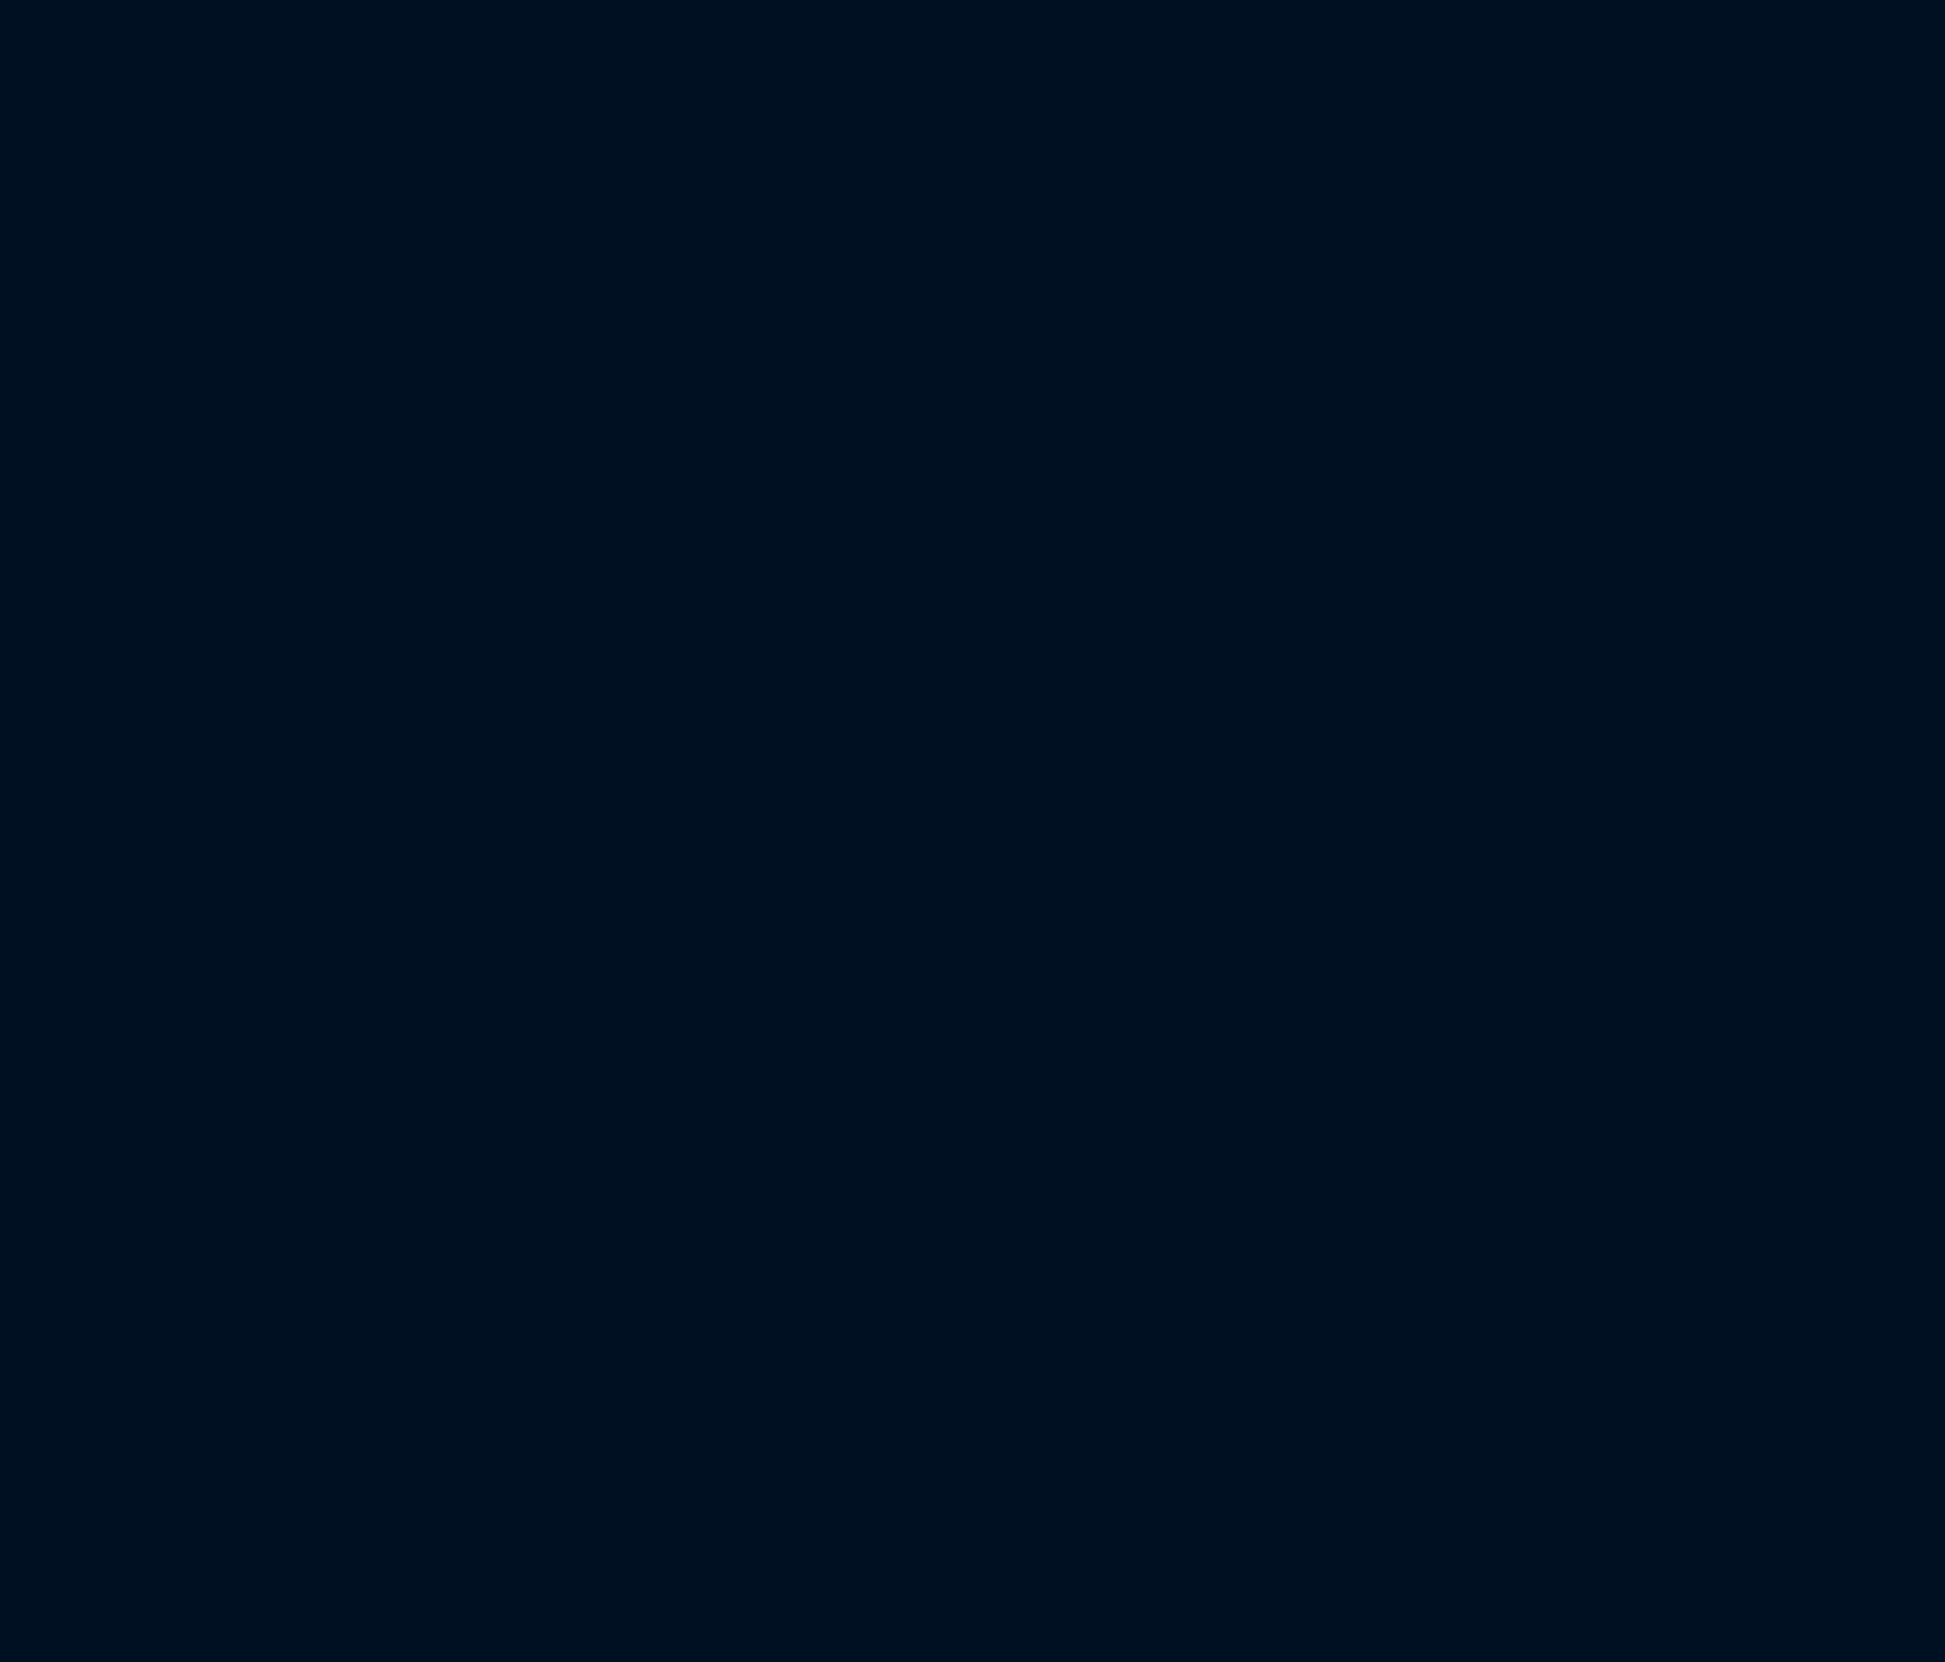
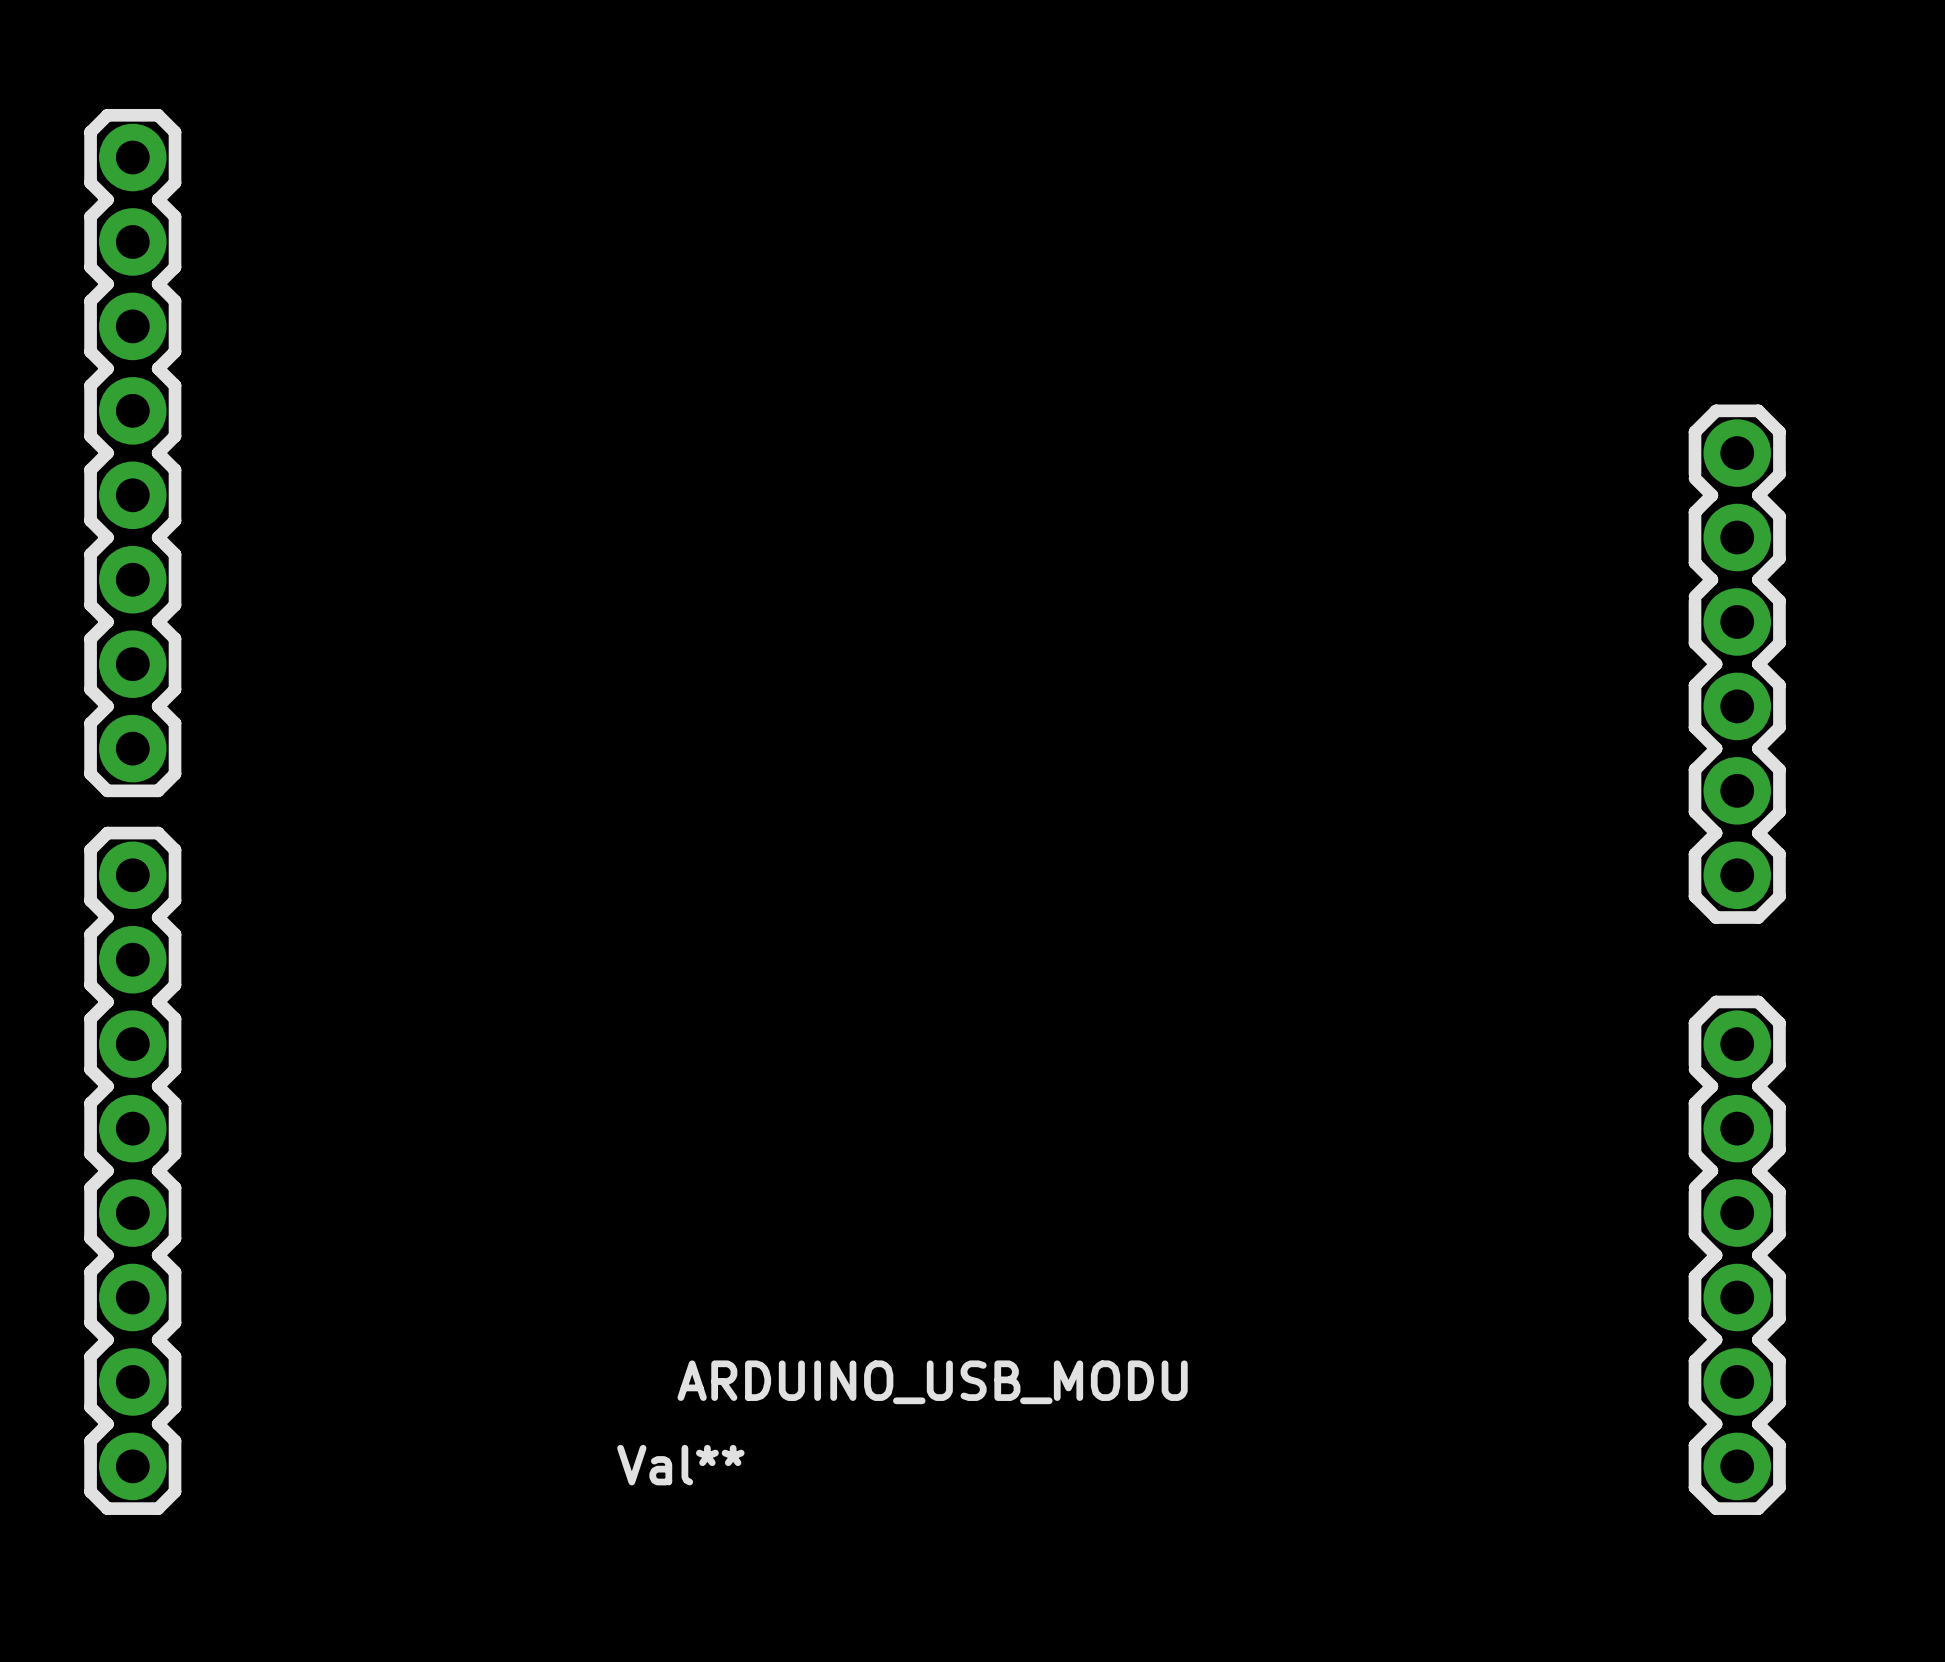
ARDUINO_USB_MODU: none -> Val** (935, 811)

